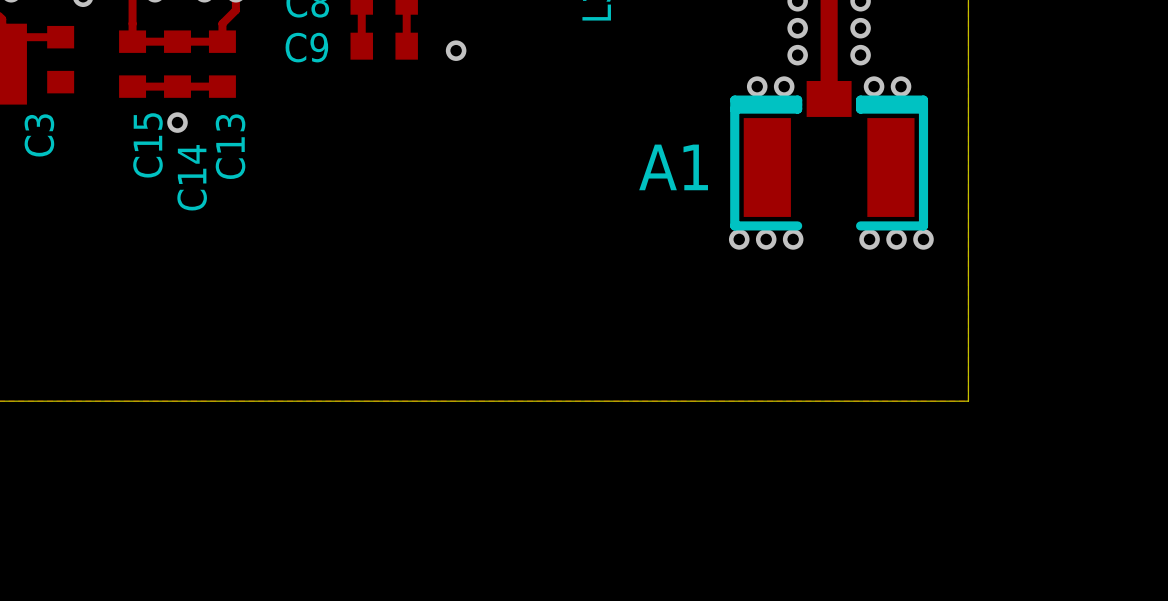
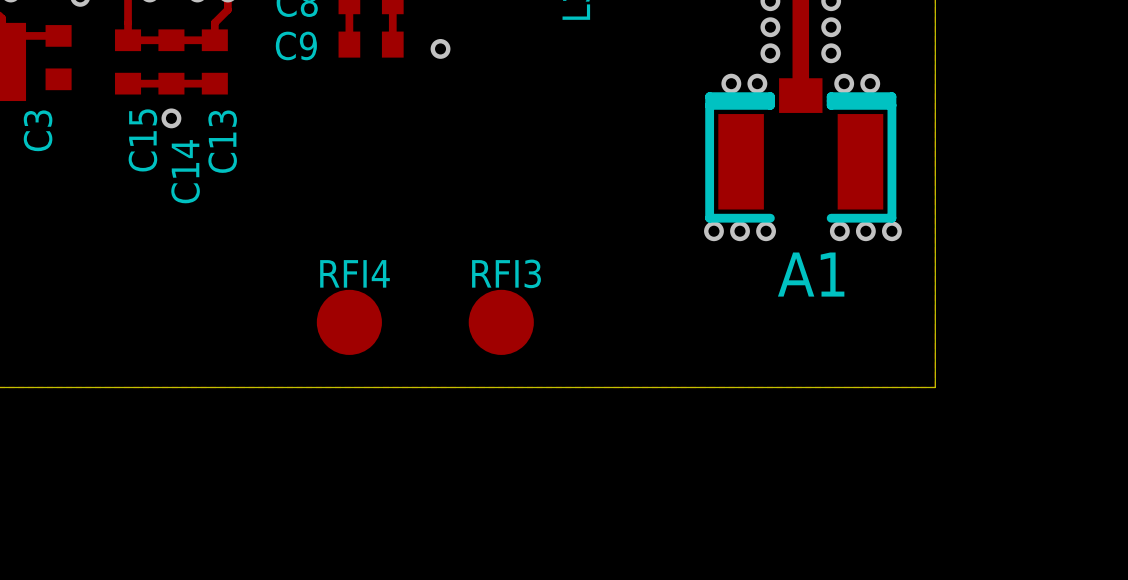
A1 name position: A1 (673, 167) -> A1 (811, 274)
RFI4: none -> (349, 322)
RFI3: none -> (501, 322)

